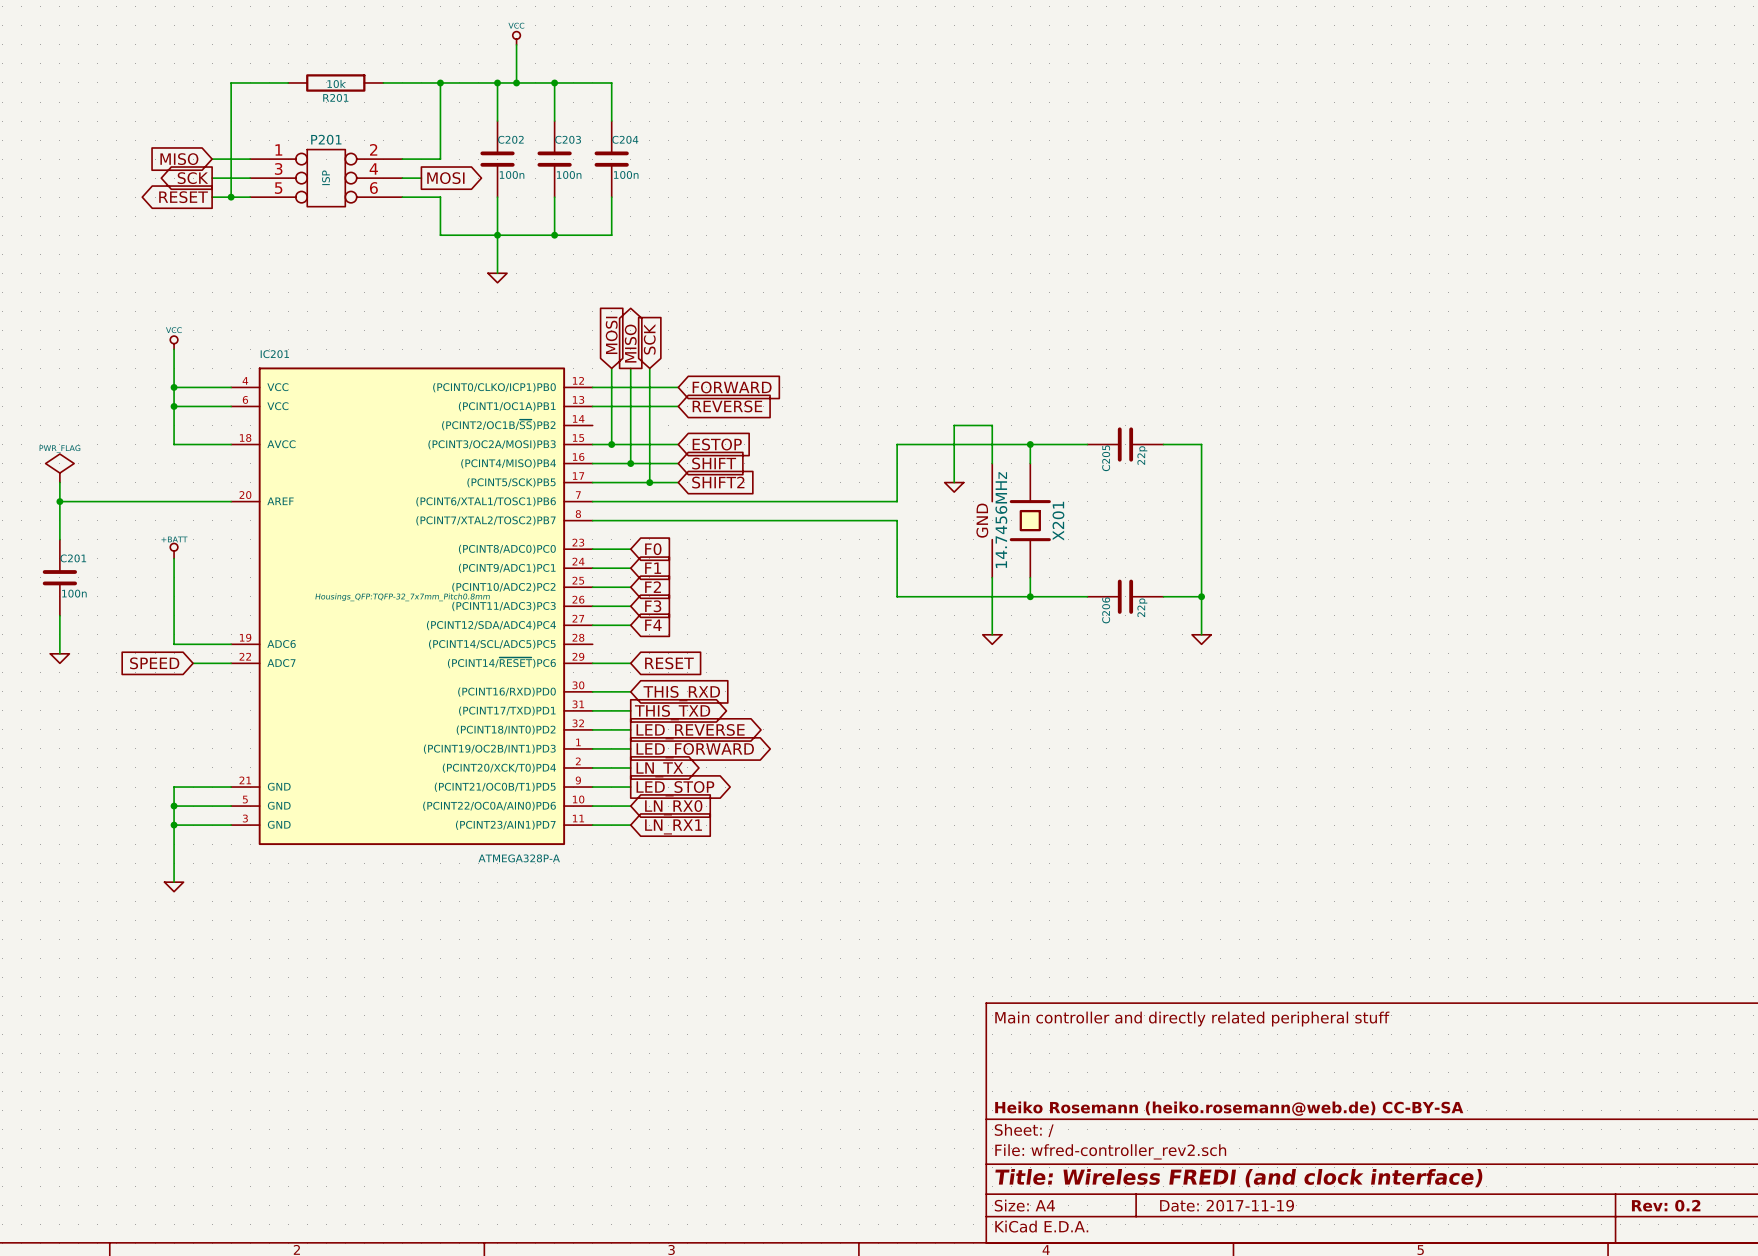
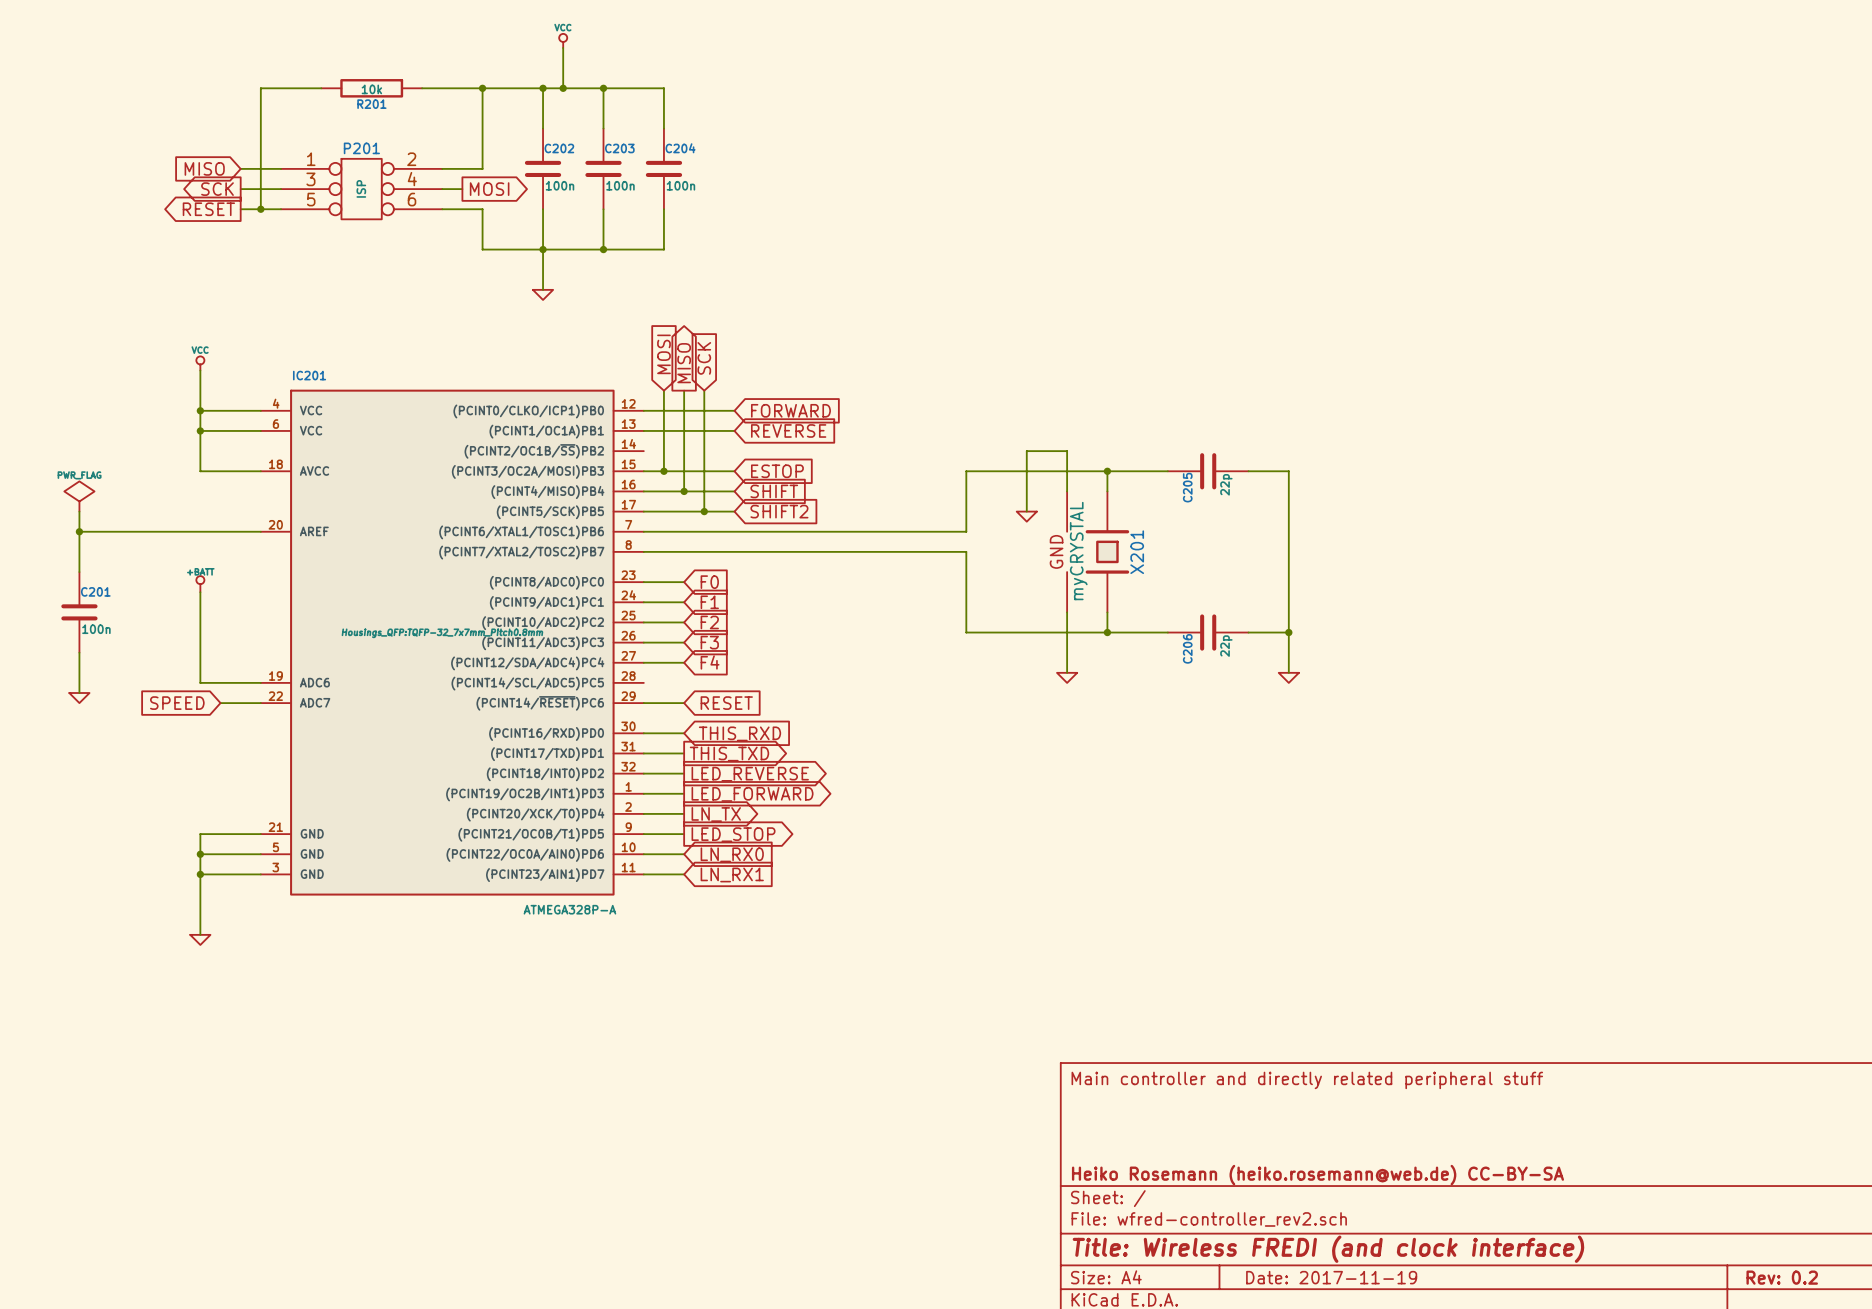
X201 value: 14.7456MHz (1001, 520) -> myCRYSTAL (1078, 551)

